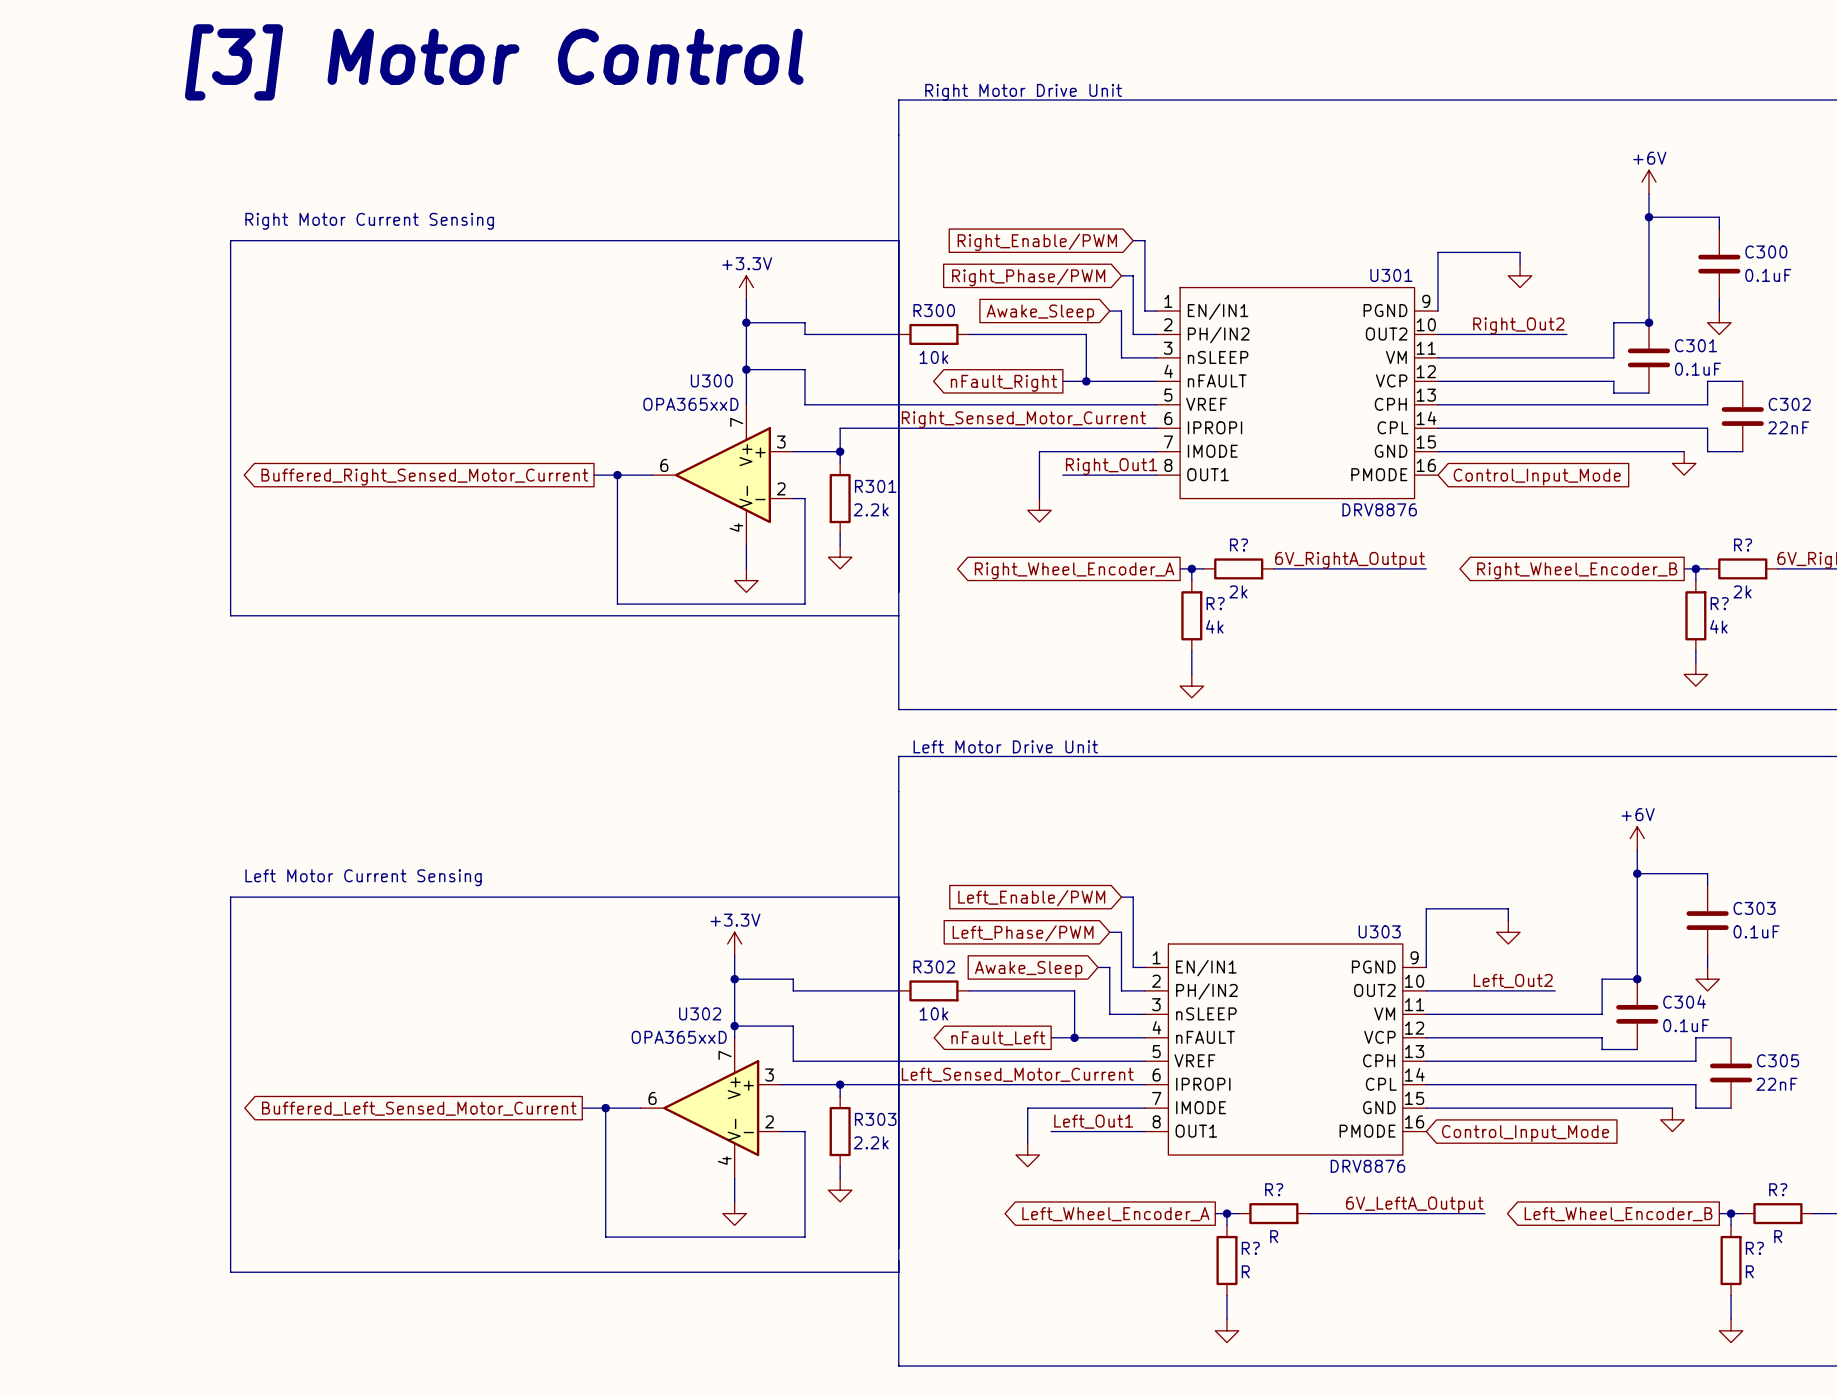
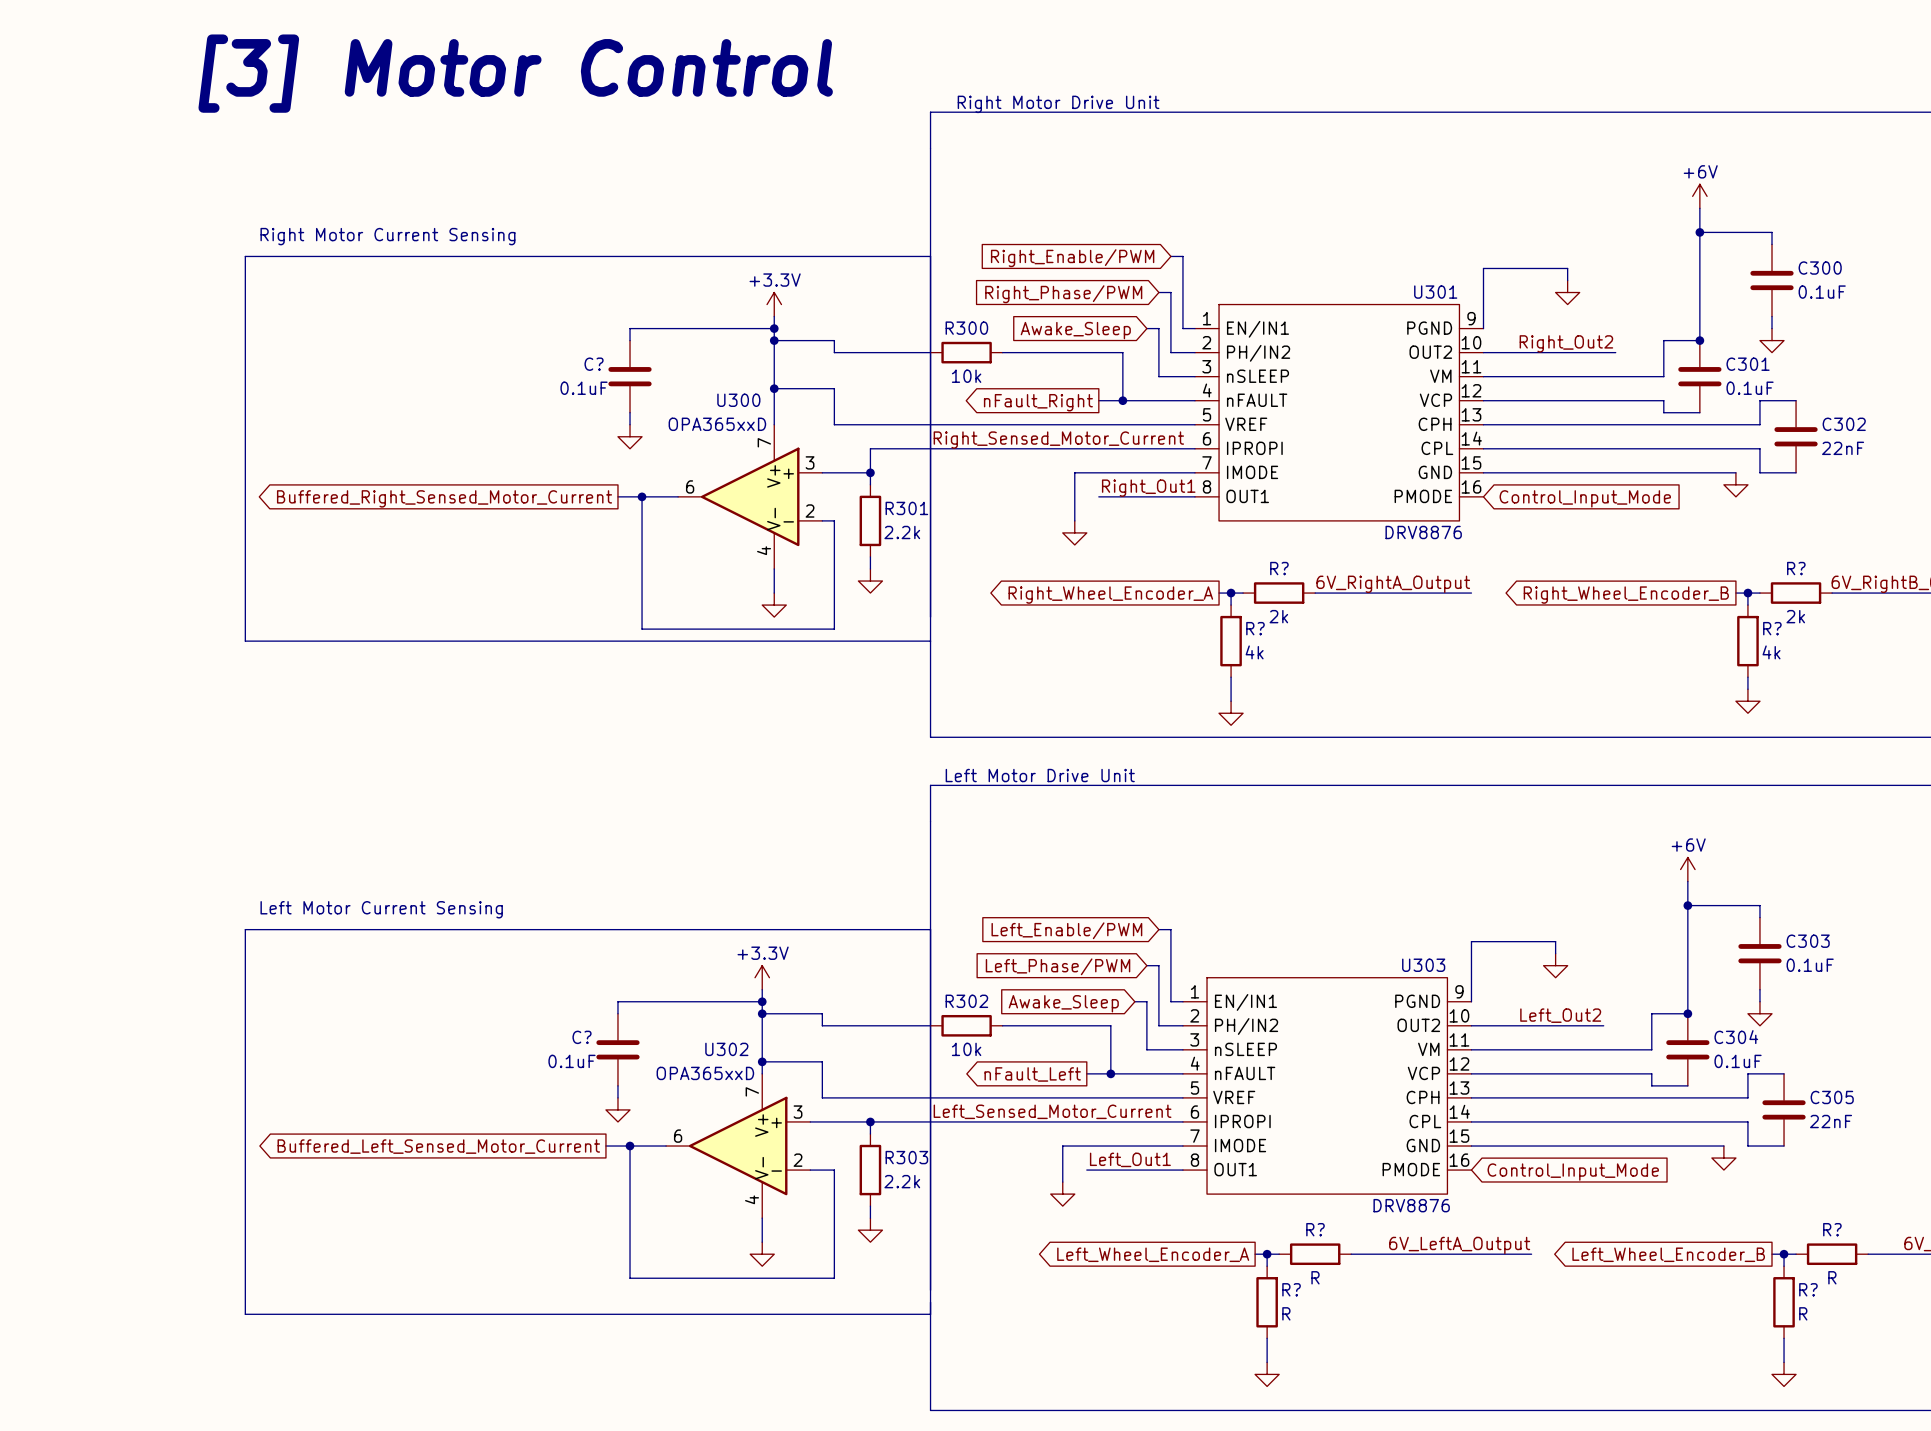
wire: none -> (774, 328) (630, 328) (630, 340)
junction: none -> (774, 328)
C?: none -> 0.1uF (630, 376)
wire: none -> (630, 412) (630, 424)
power symbol: none -> (630, 436)
wire: none -> (762, 1001) (617, 1001) (617, 1013)
junction: none -> (762, 1001)
C?: none -> 0.1uF (617, 1049)
wire: none -> (617, 1085) (617, 1097)
power symbol: none -> (617, 1109)

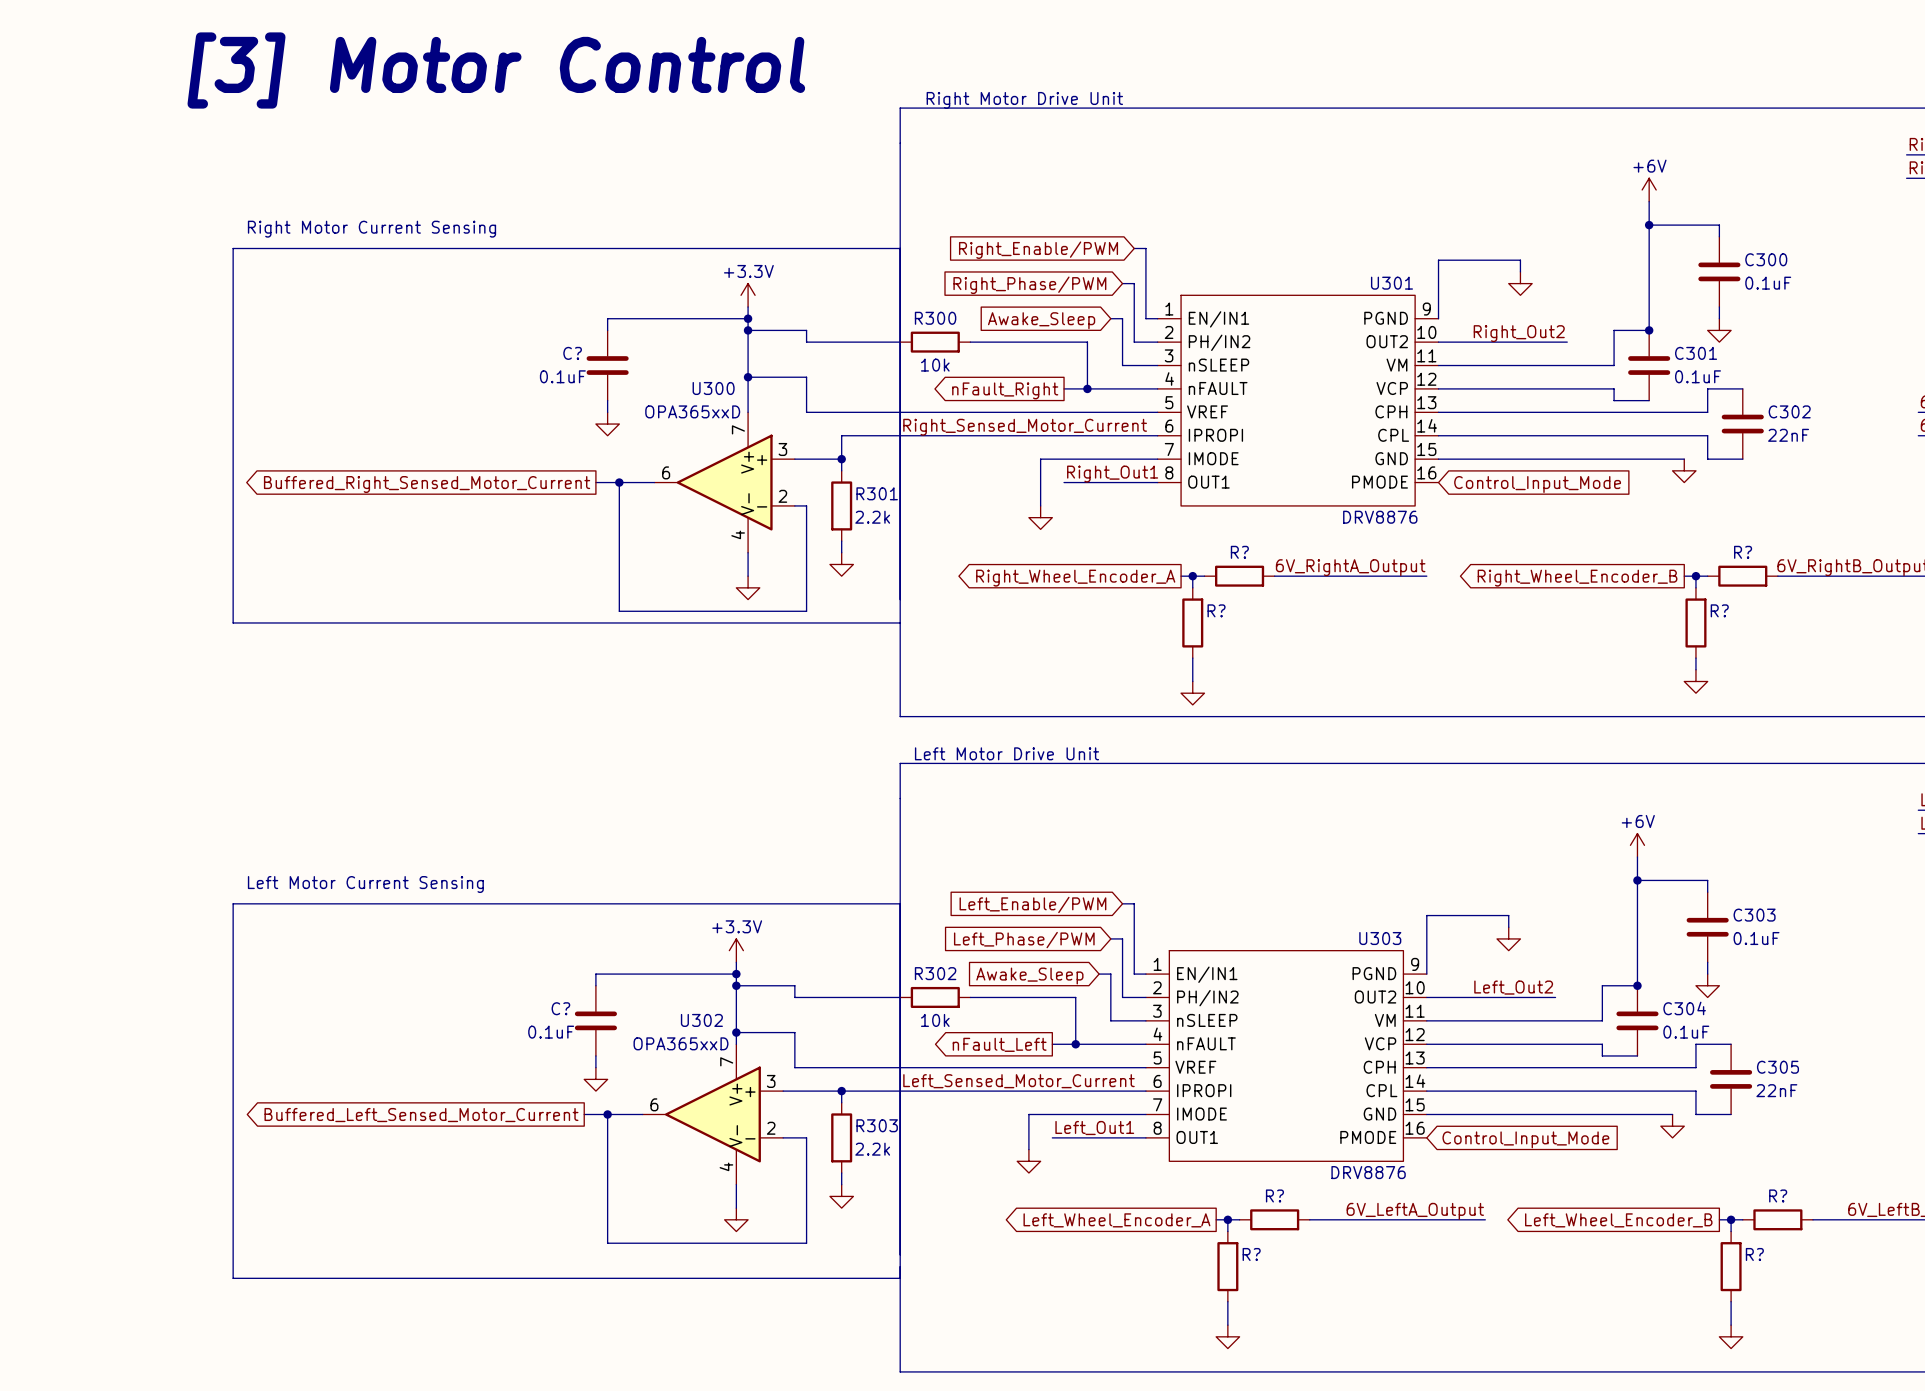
R? value: 2k (1278, 616) -> none
R? value: 2k (1795, 616) -> none
R? value: 4k (1254, 652) -> none
R? value: 4k (1771, 652) -> none
R? value: R (1315, 1277) -> none
R? value: R (1832, 1277) -> none
R? value: R (1286, 1313) -> none
R? value: R (1803, 1313) -> none

